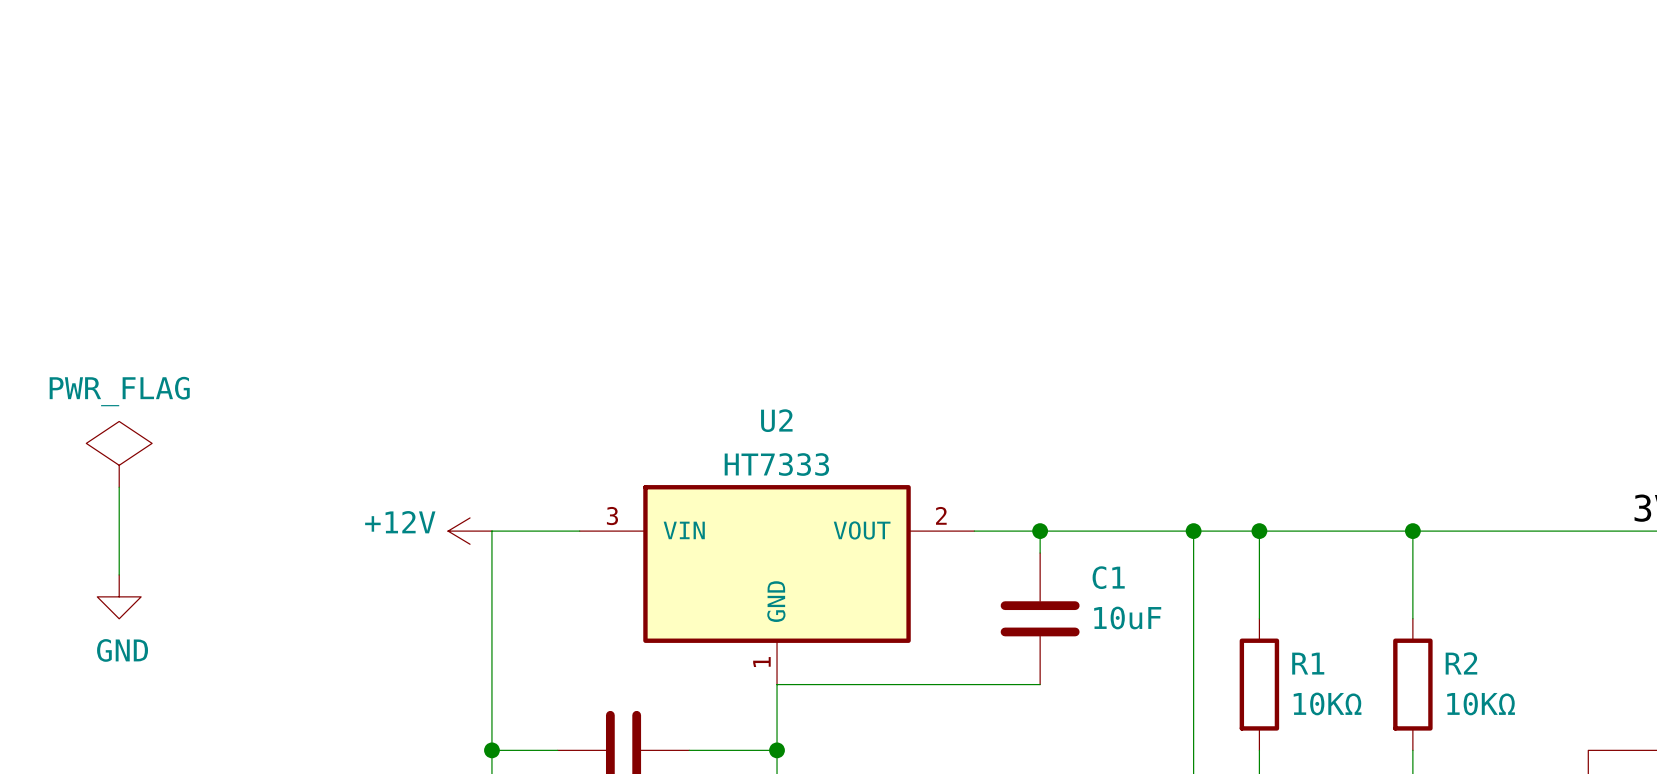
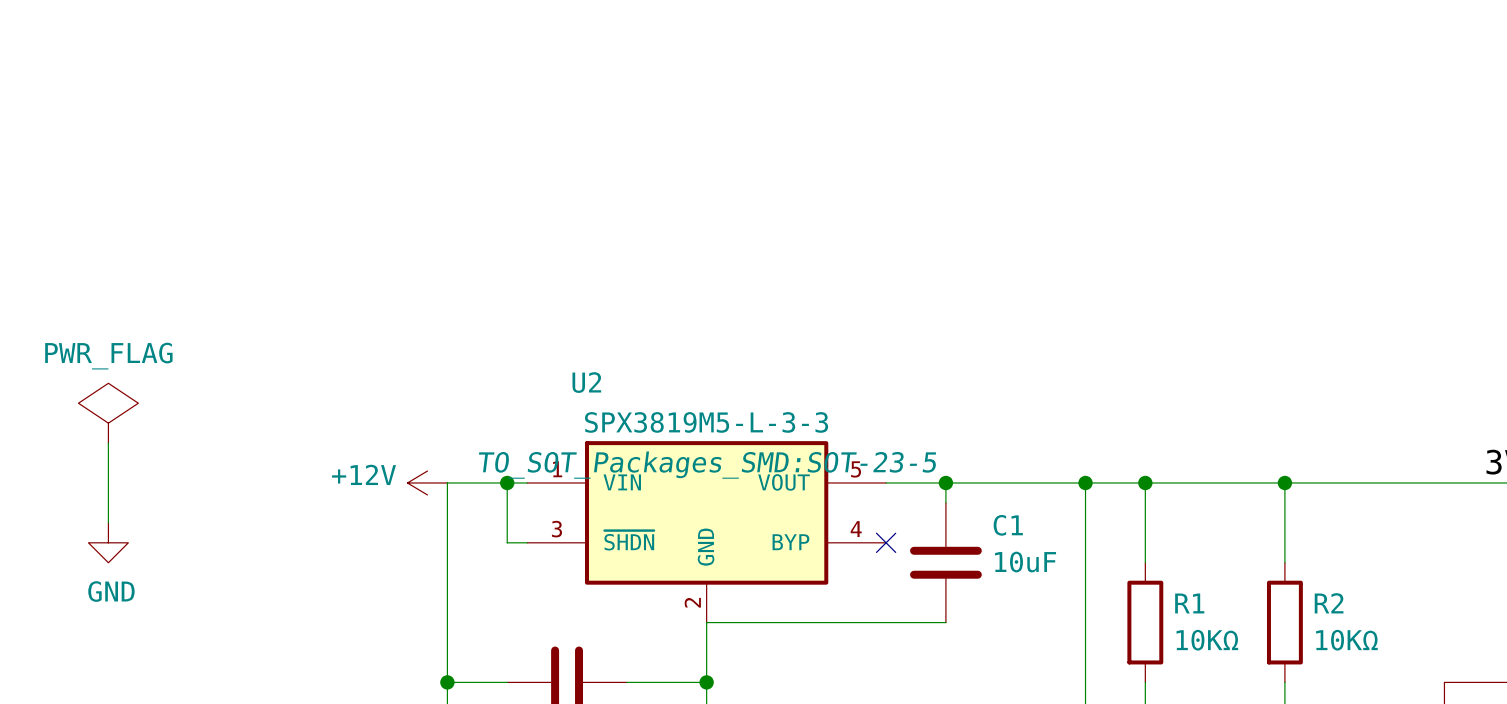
U2 name position: U2 (776, 420) -> U2 (586, 382)
U2 value: HT7333 (776, 464) -> SPX3819M5-L-3-3 (706, 422)
U2 symbol: [579, 485, 975, 685] -> [527, 441, 887, 623]
U2 text: none -> TO_SOT_Packages_SMD:SOT-23-5 (707, 465)
wire: none -> (507, 482) (507, 542) (527, 542)
junction: none -> (507, 482)
no-connect mark: none -> (886, 542)

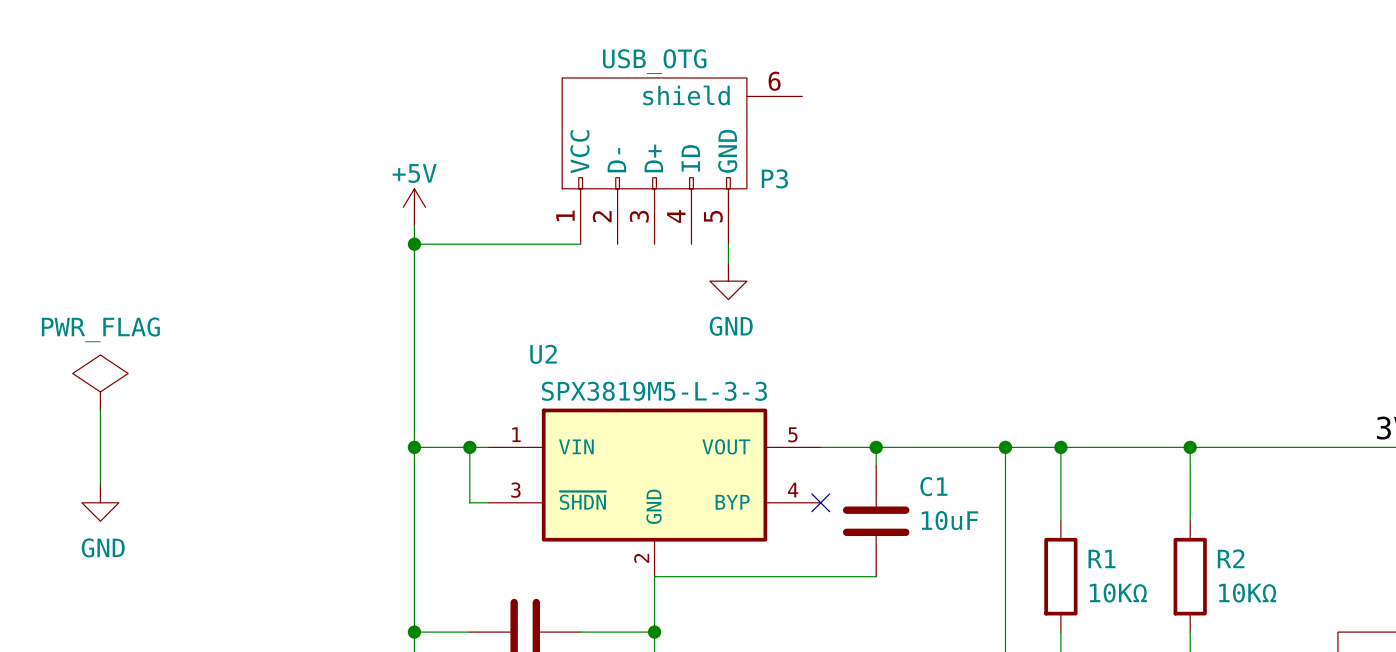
P3: none -> USB_OTG (682, 161)
power symbol: none -> +5V (414, 207)
wire: none -> (414, 225) (414, 447)
wire: none -> (414, 244) (580, 244)
junction: none -> (414, 244)
wire: none -> (728, 244) (728, 262)
power symbol: none -> GND (728, 281)
U2 text: TO_SOT_Packages_SMD:SOT-23-5 (707, 465) -> none
power symbol: +12V (427, 482) -> none
junction: none -> (414, 447)

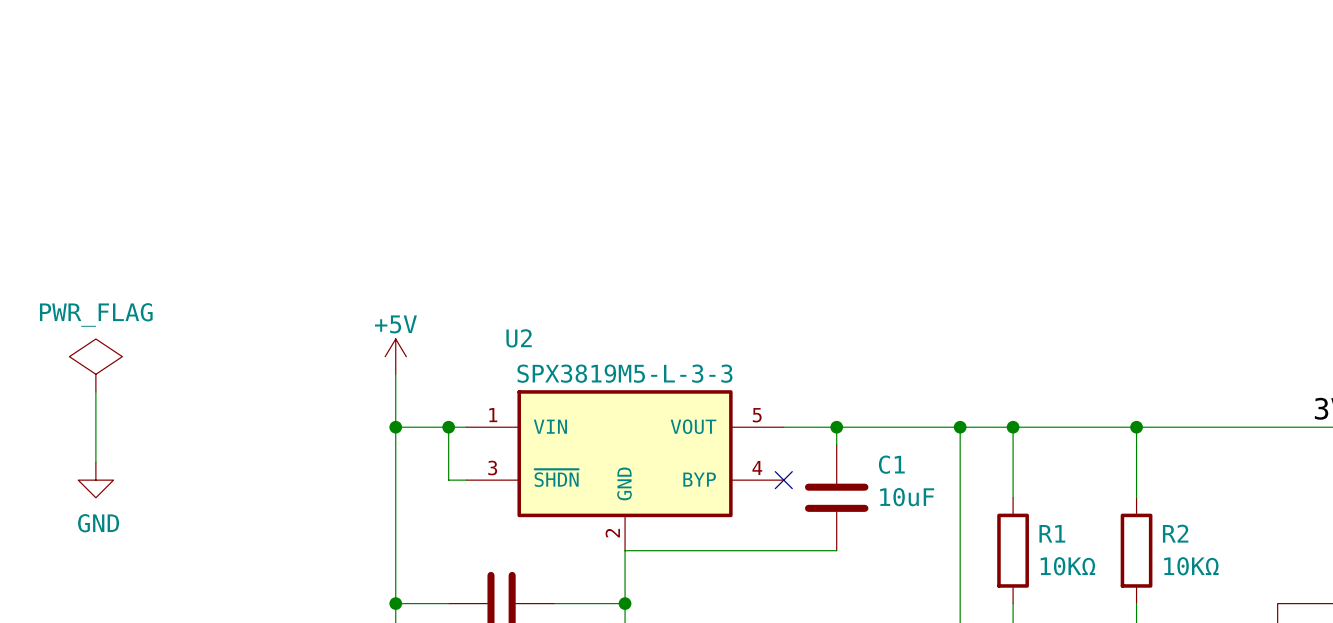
P3: USB_OTG (682, 161) -> none
power symbol position: +5V (414, 207) -> +5V (395, 356)
wire: (414, 225) (414, 391) -> none
wire: (414, 244) (580, 244) -> none
junction: (414, 244) -> none
wire: (728, 244) (728, 262) -> none
power symbol: GND (728, 281) -> none

